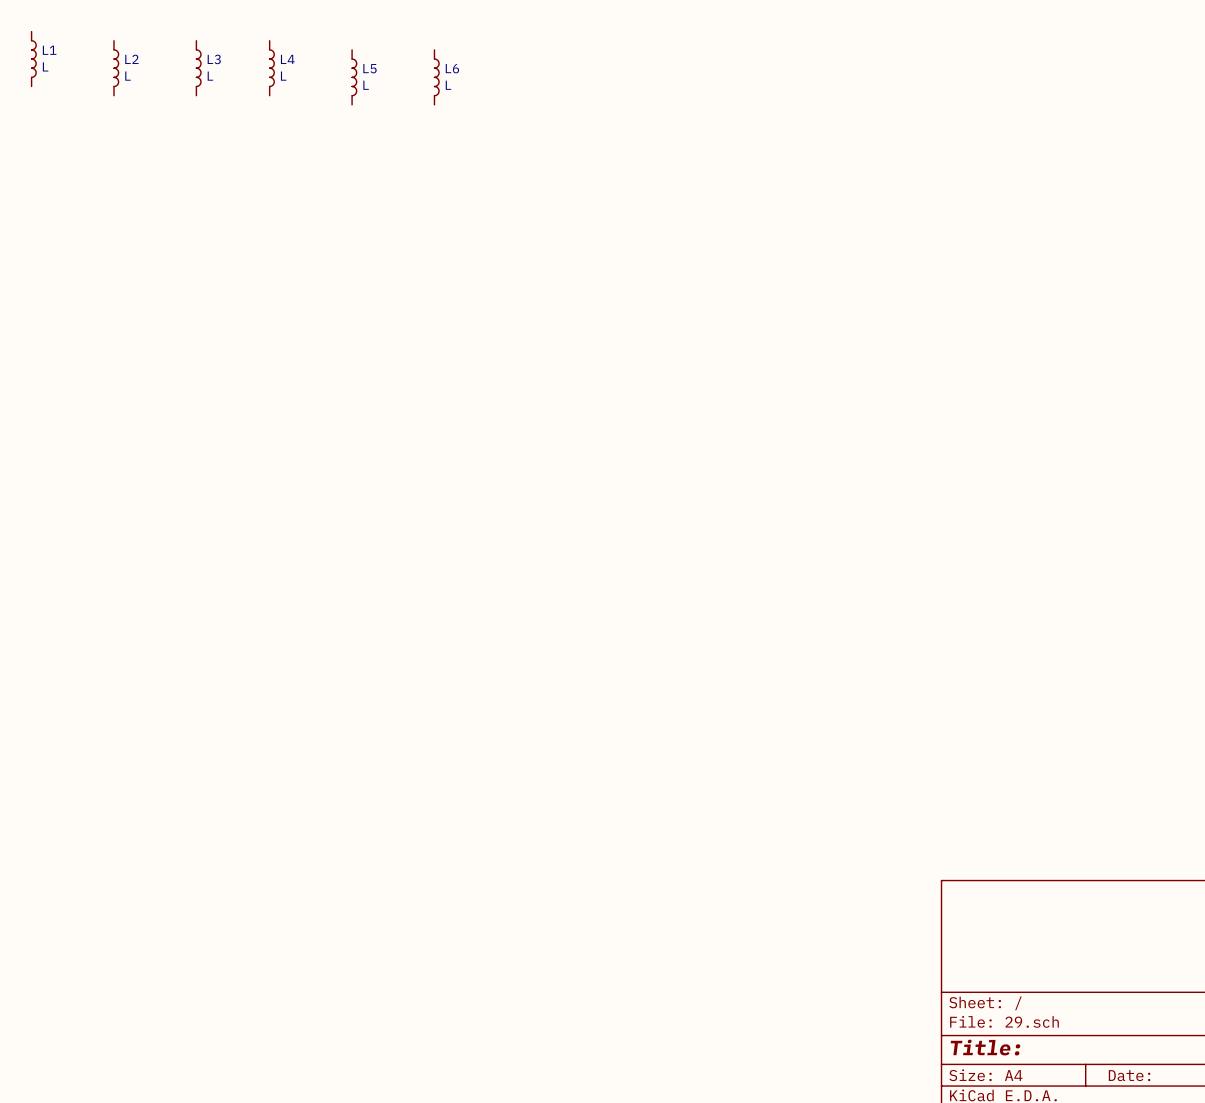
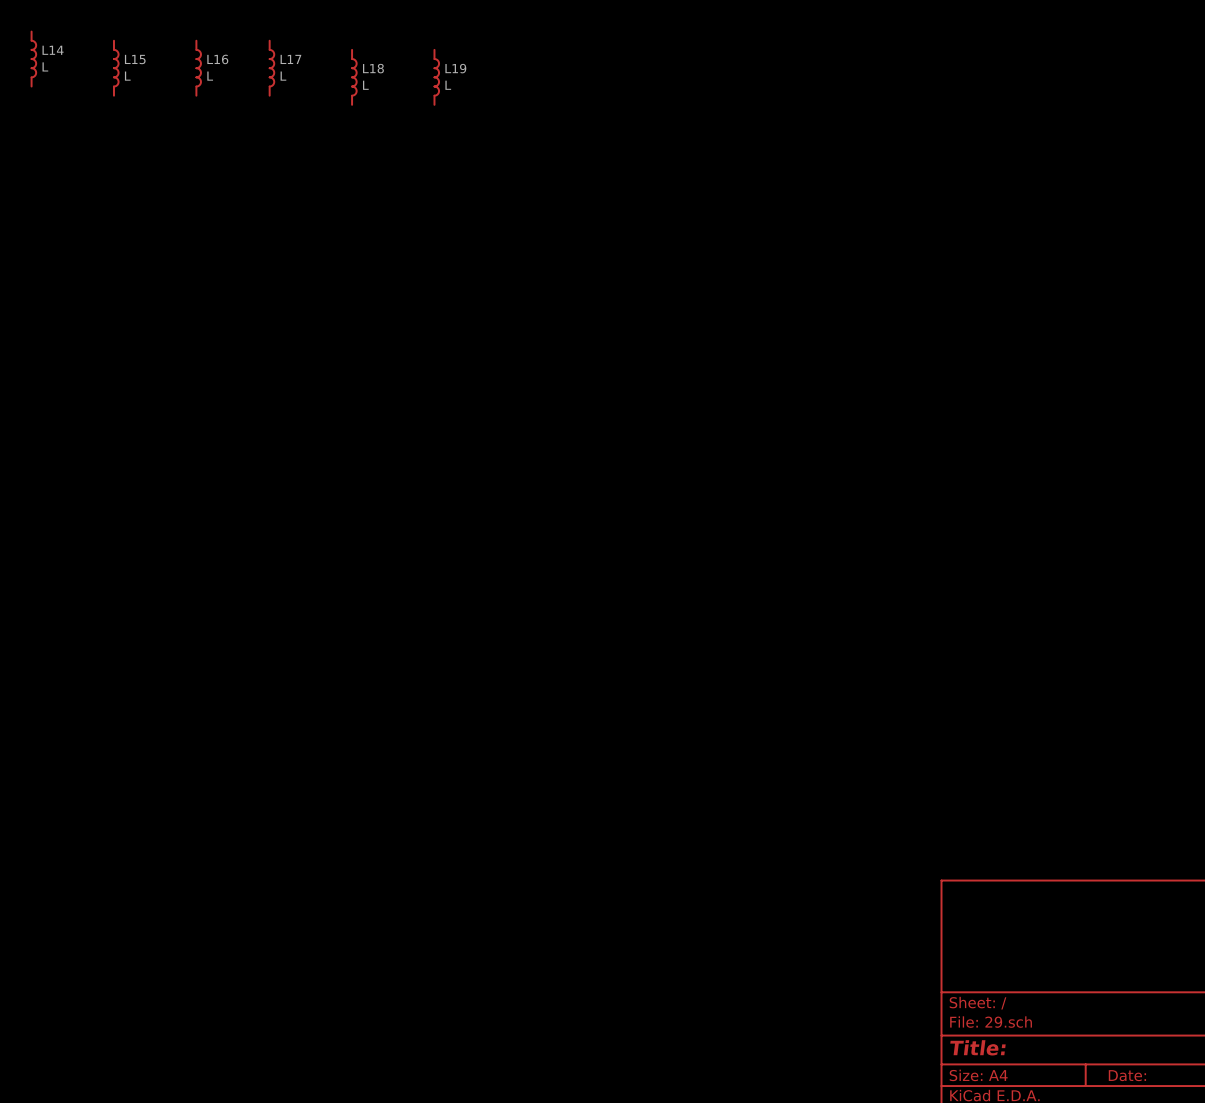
L1 name: L1 (49, 50) -> L14 (53, 50)
L2 name: L2 (131, 59) -> L15 (135, 59)
L3 name: L3 (214, 59) -> L16 (217, 59)
L4 name: L4 (287, 59) -> L17 (290, 59)
L5 name: L5 (369, 68) -> L18 (373, 68)
L6 name: L6 (452, 68) -> L19 (455, 68)

